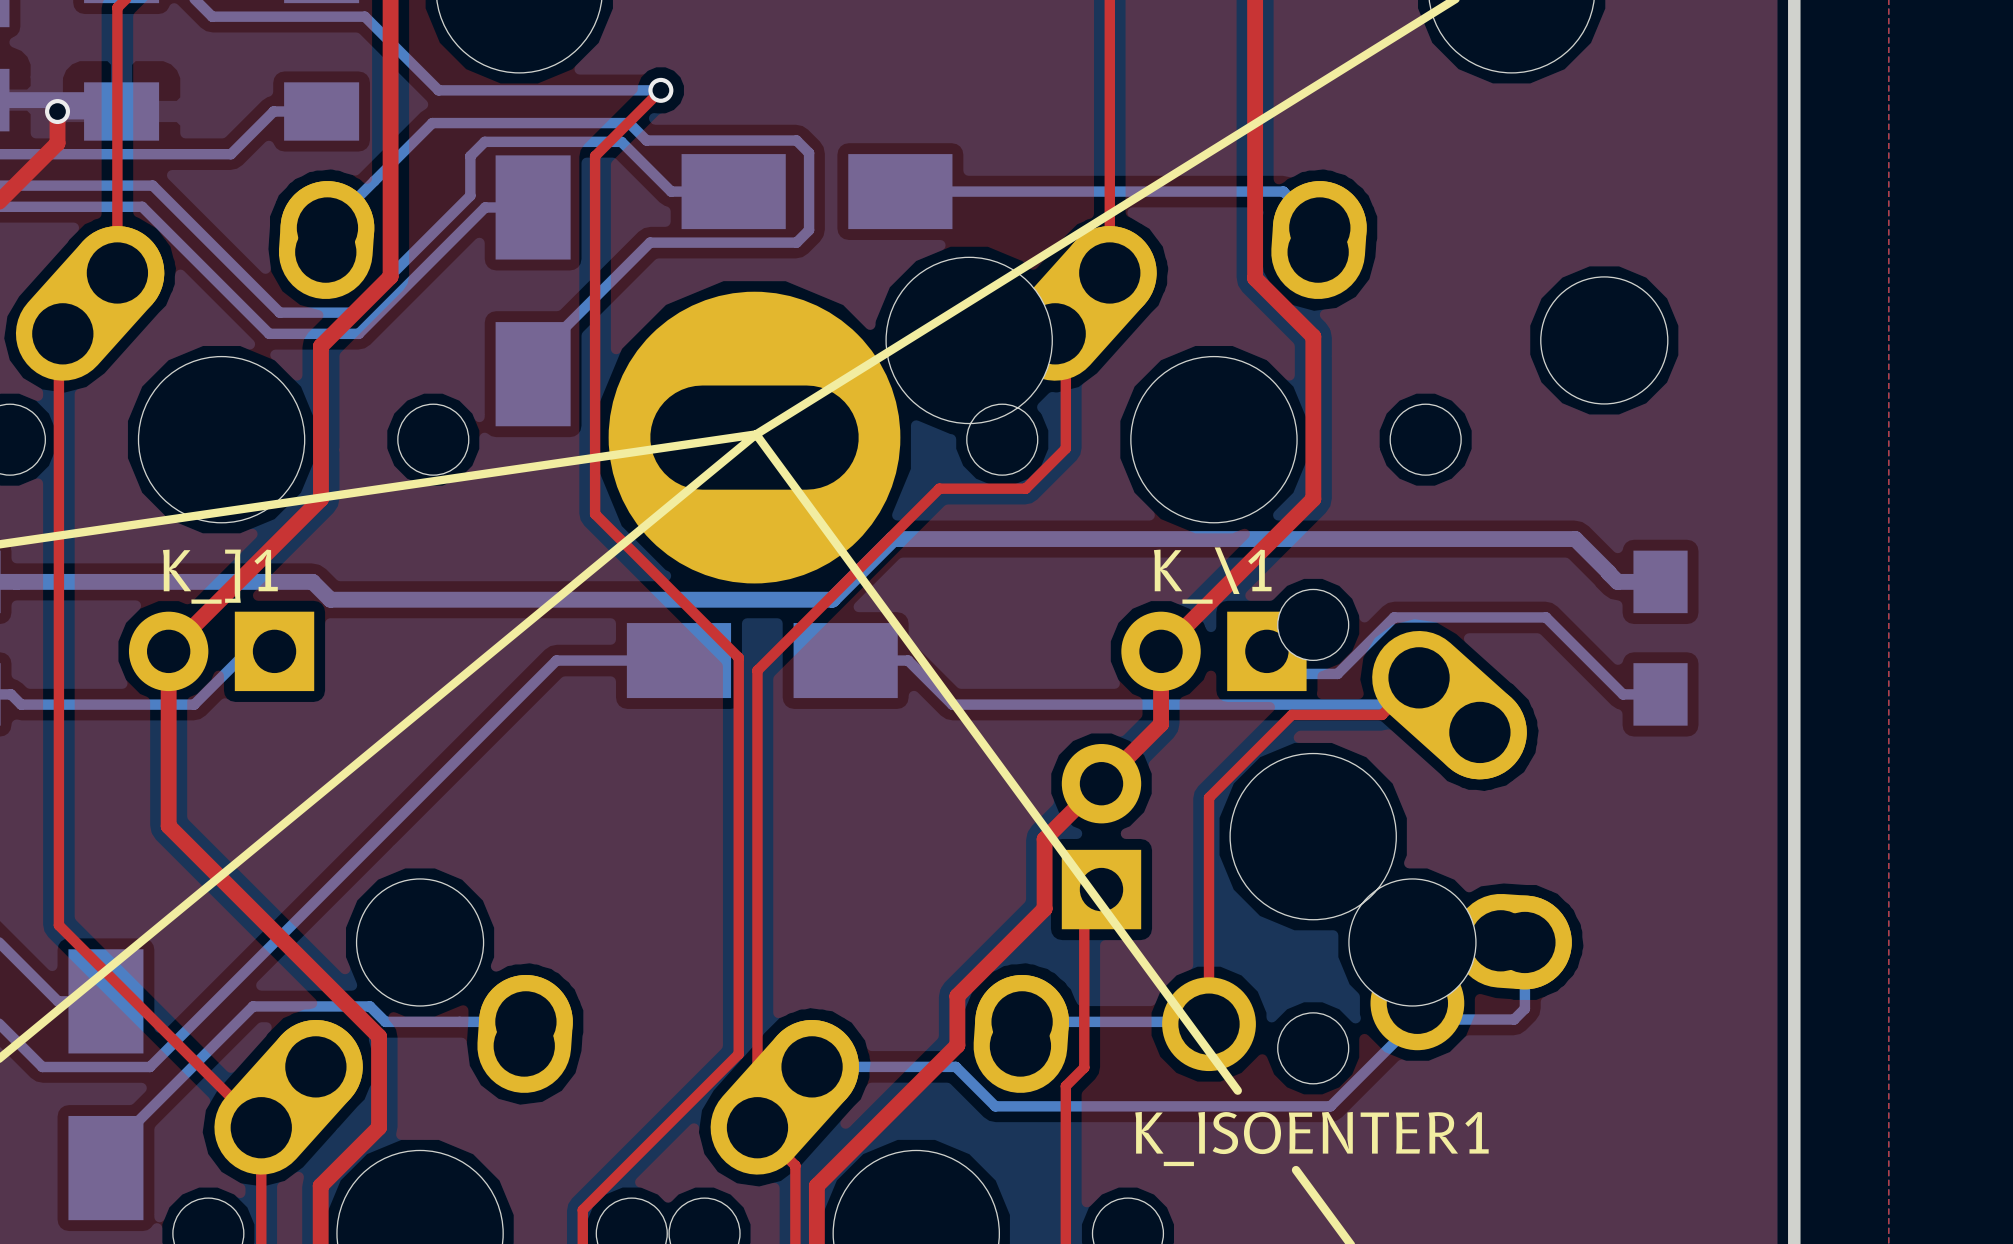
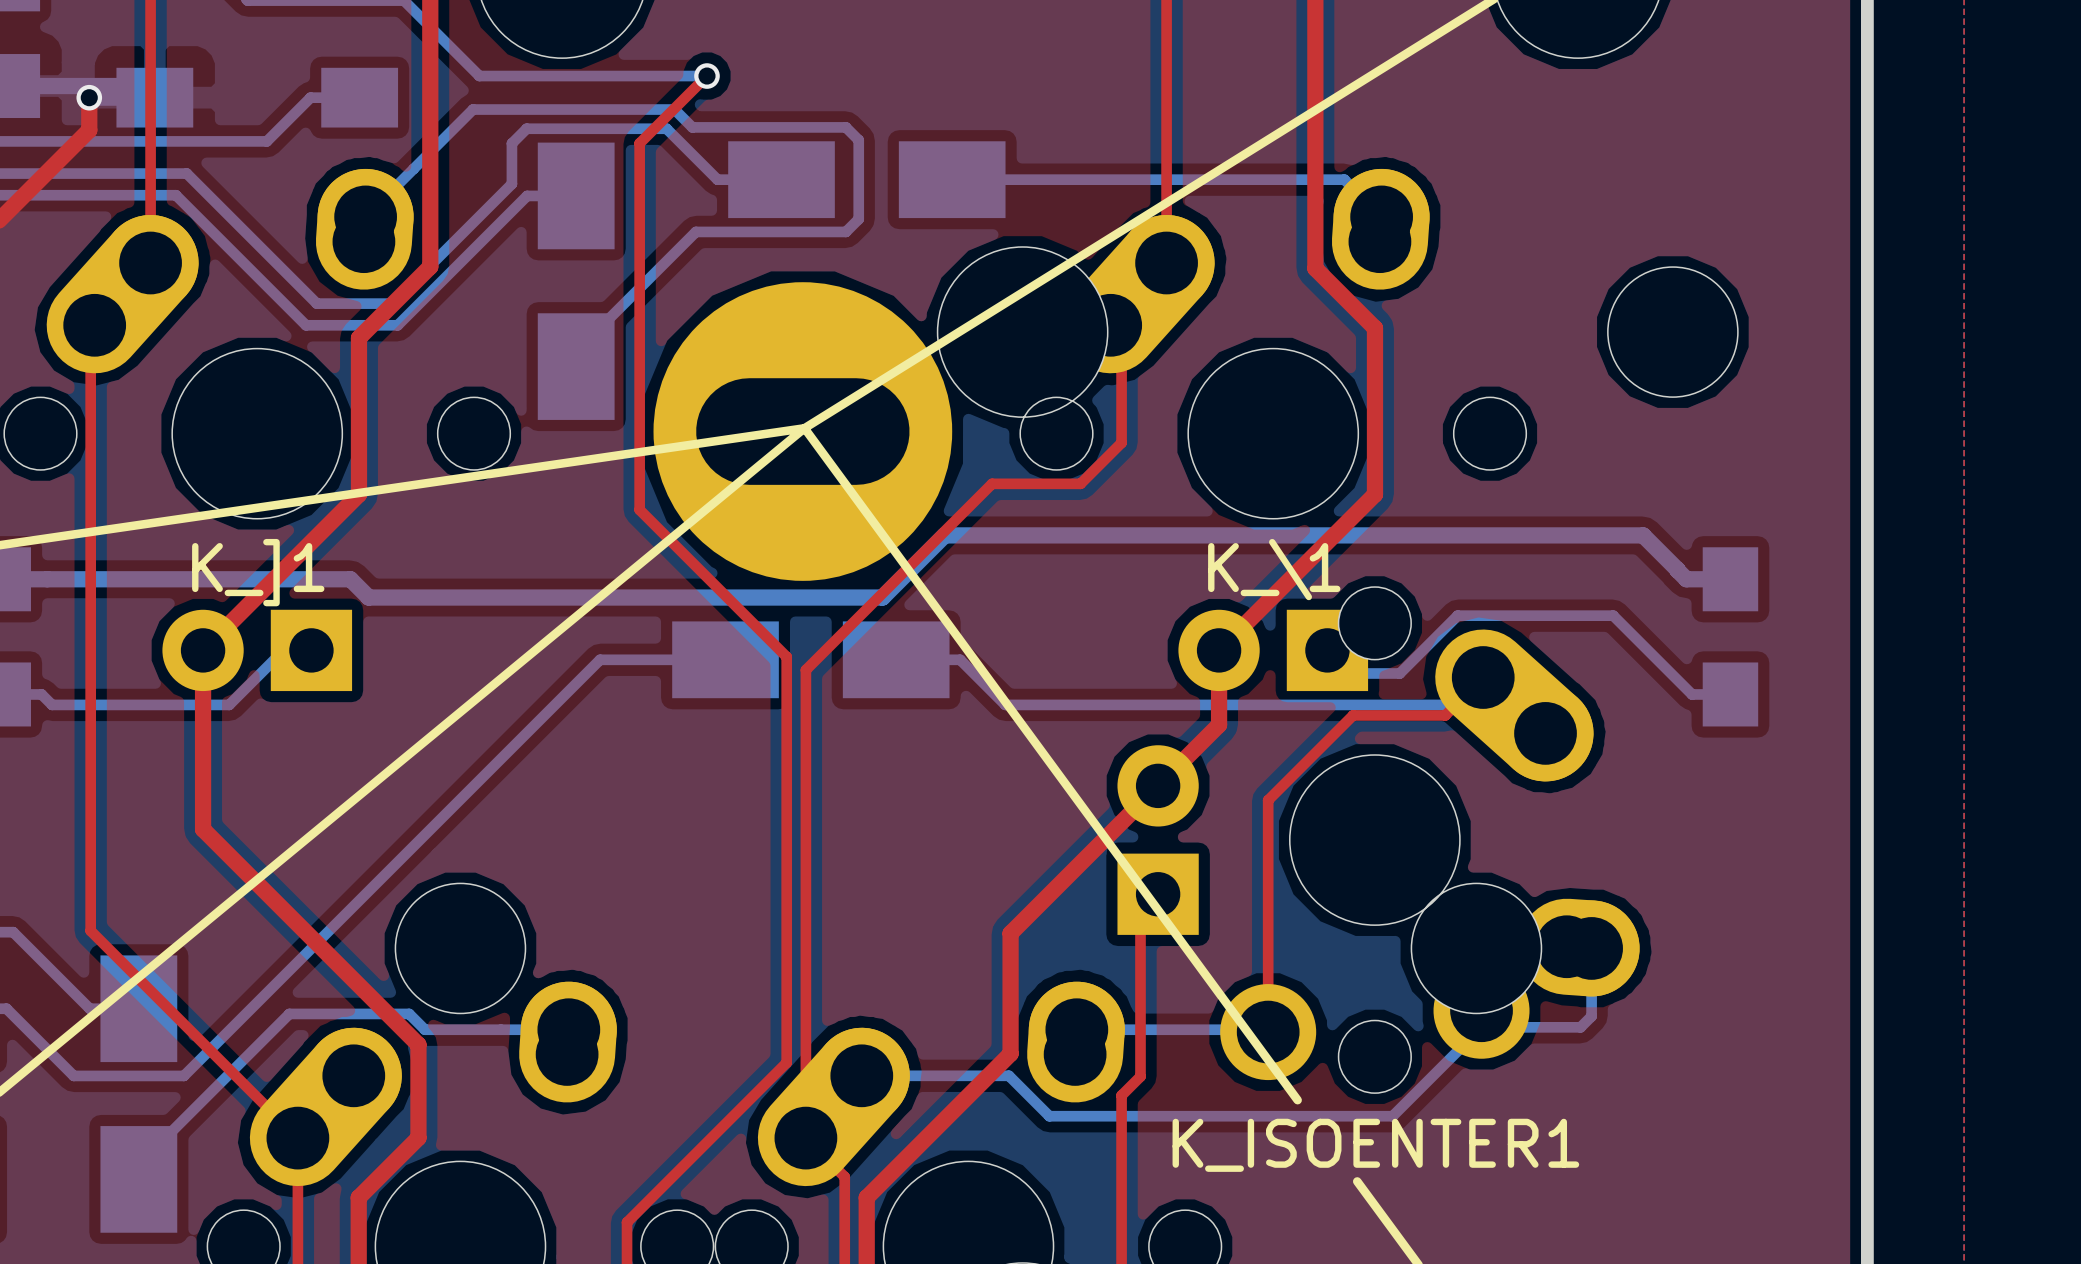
top track: (1101, 783) (1044, 839) (1044, 908) (957, 996) -> (1158, 785) (1010, 933) (1010, 1003)

